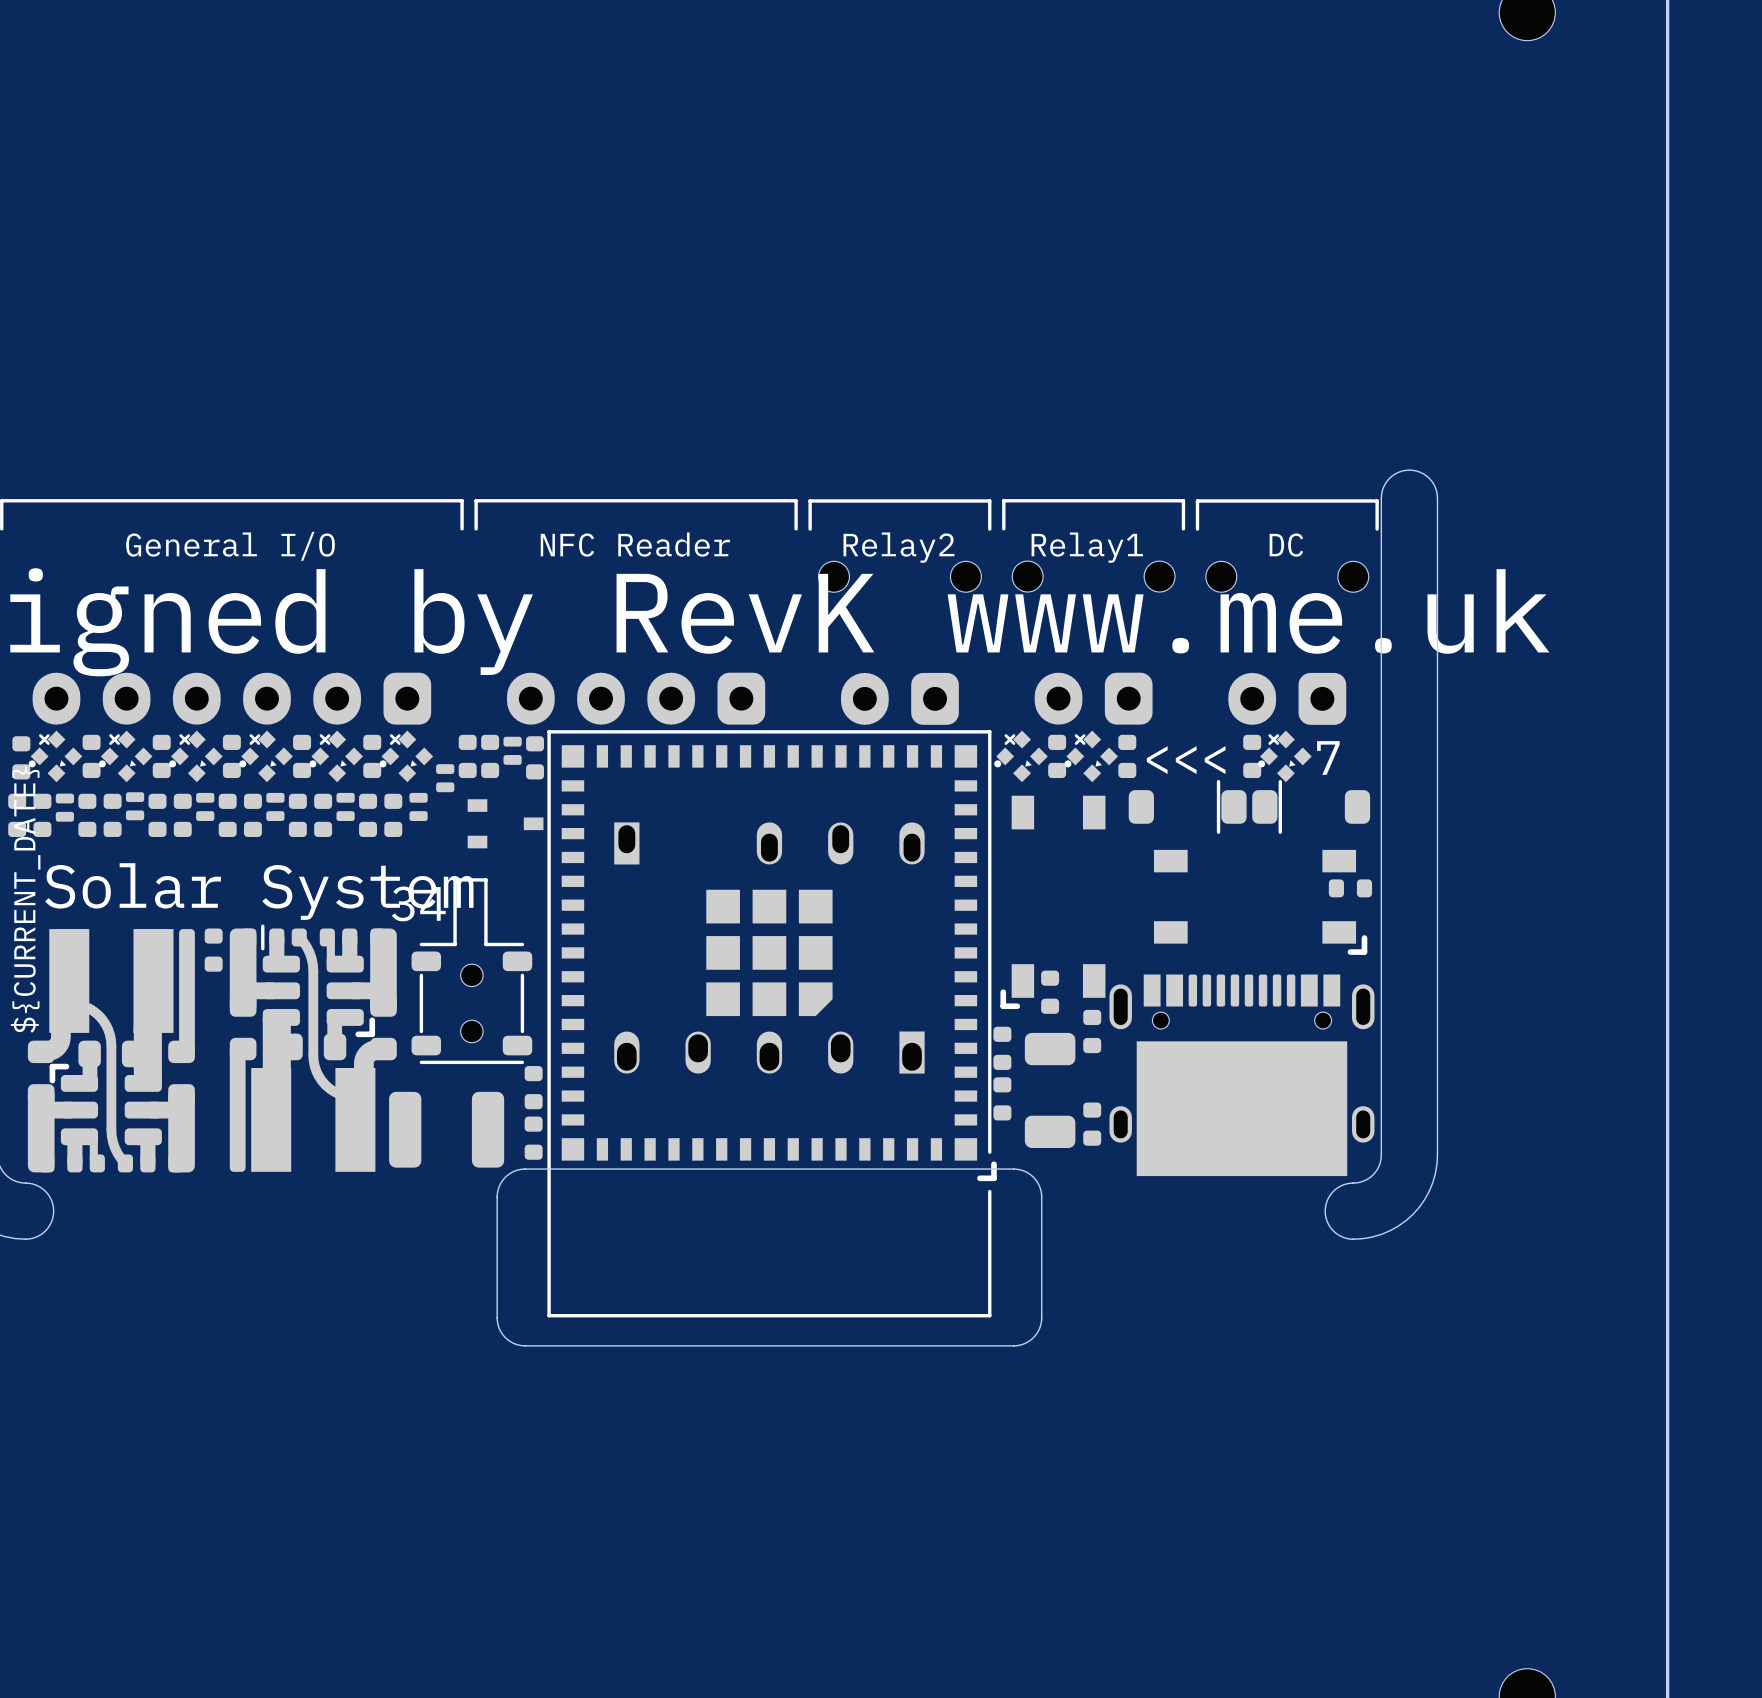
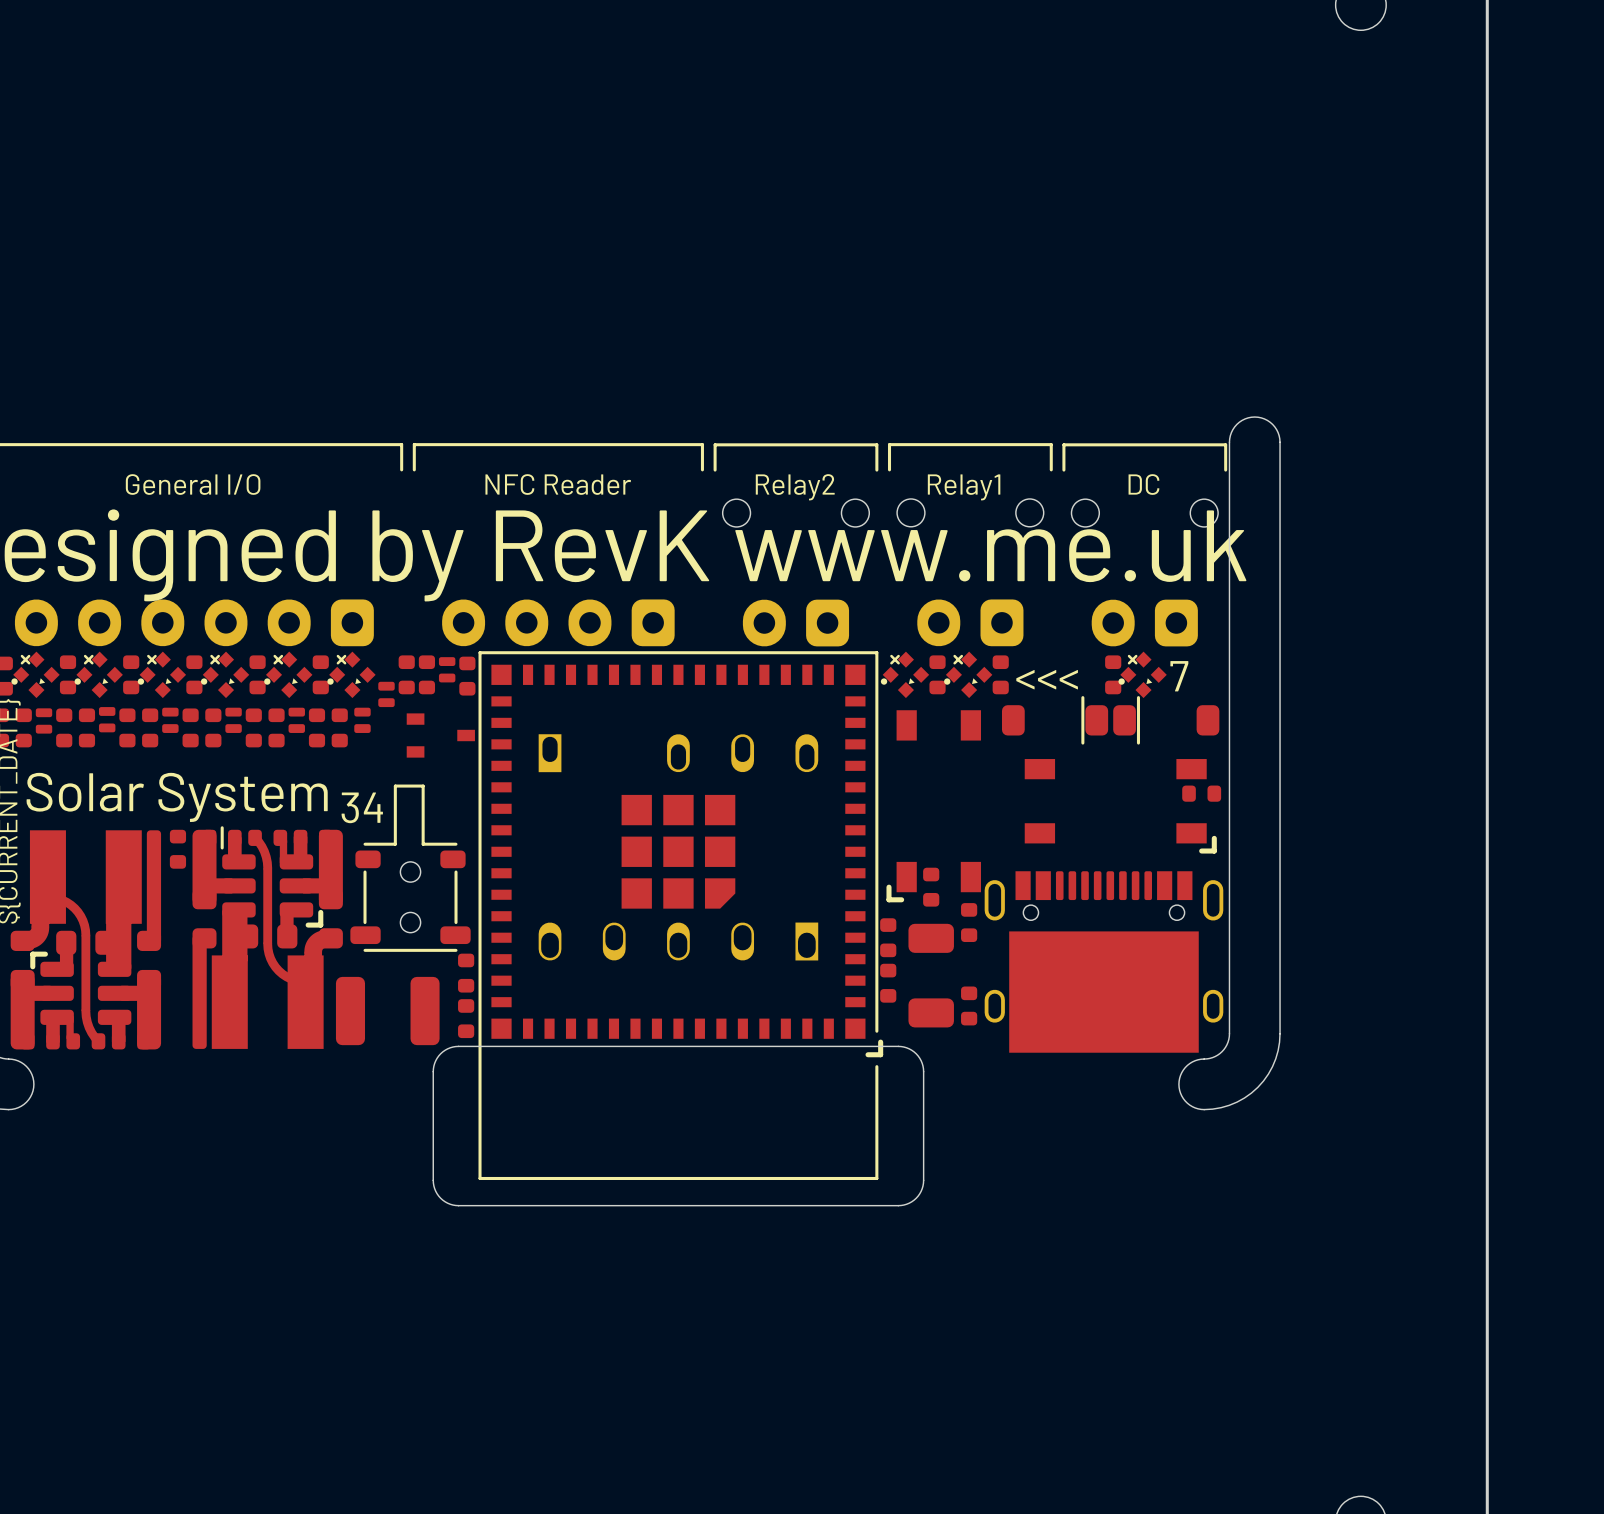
part footprint: [411, 878, 533, 1065] -> [350, 784, 471, 952]

